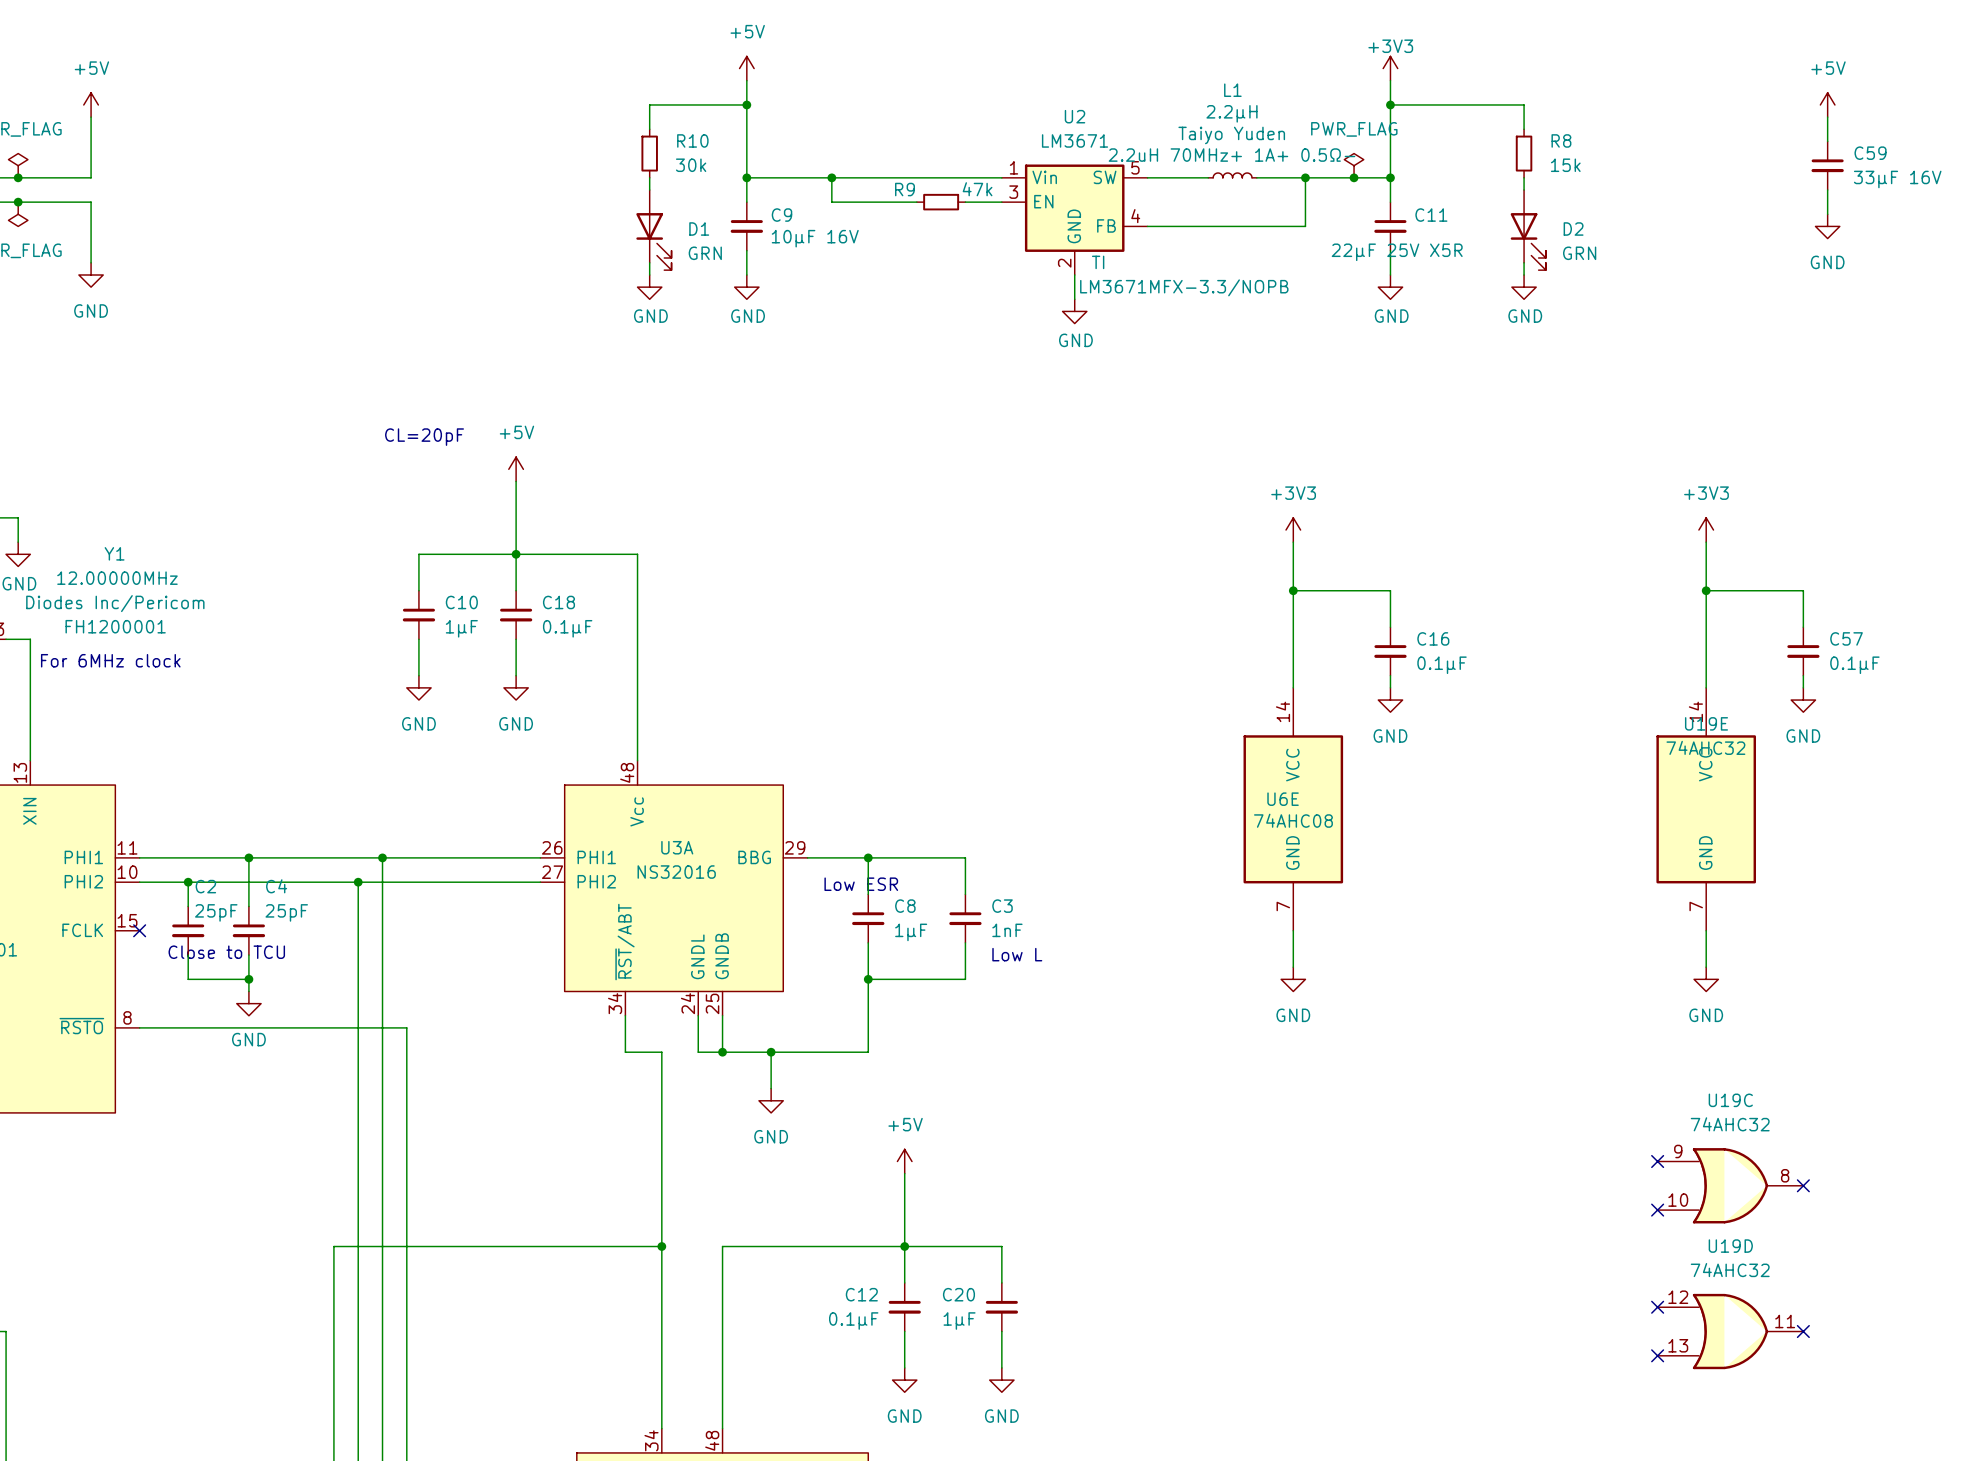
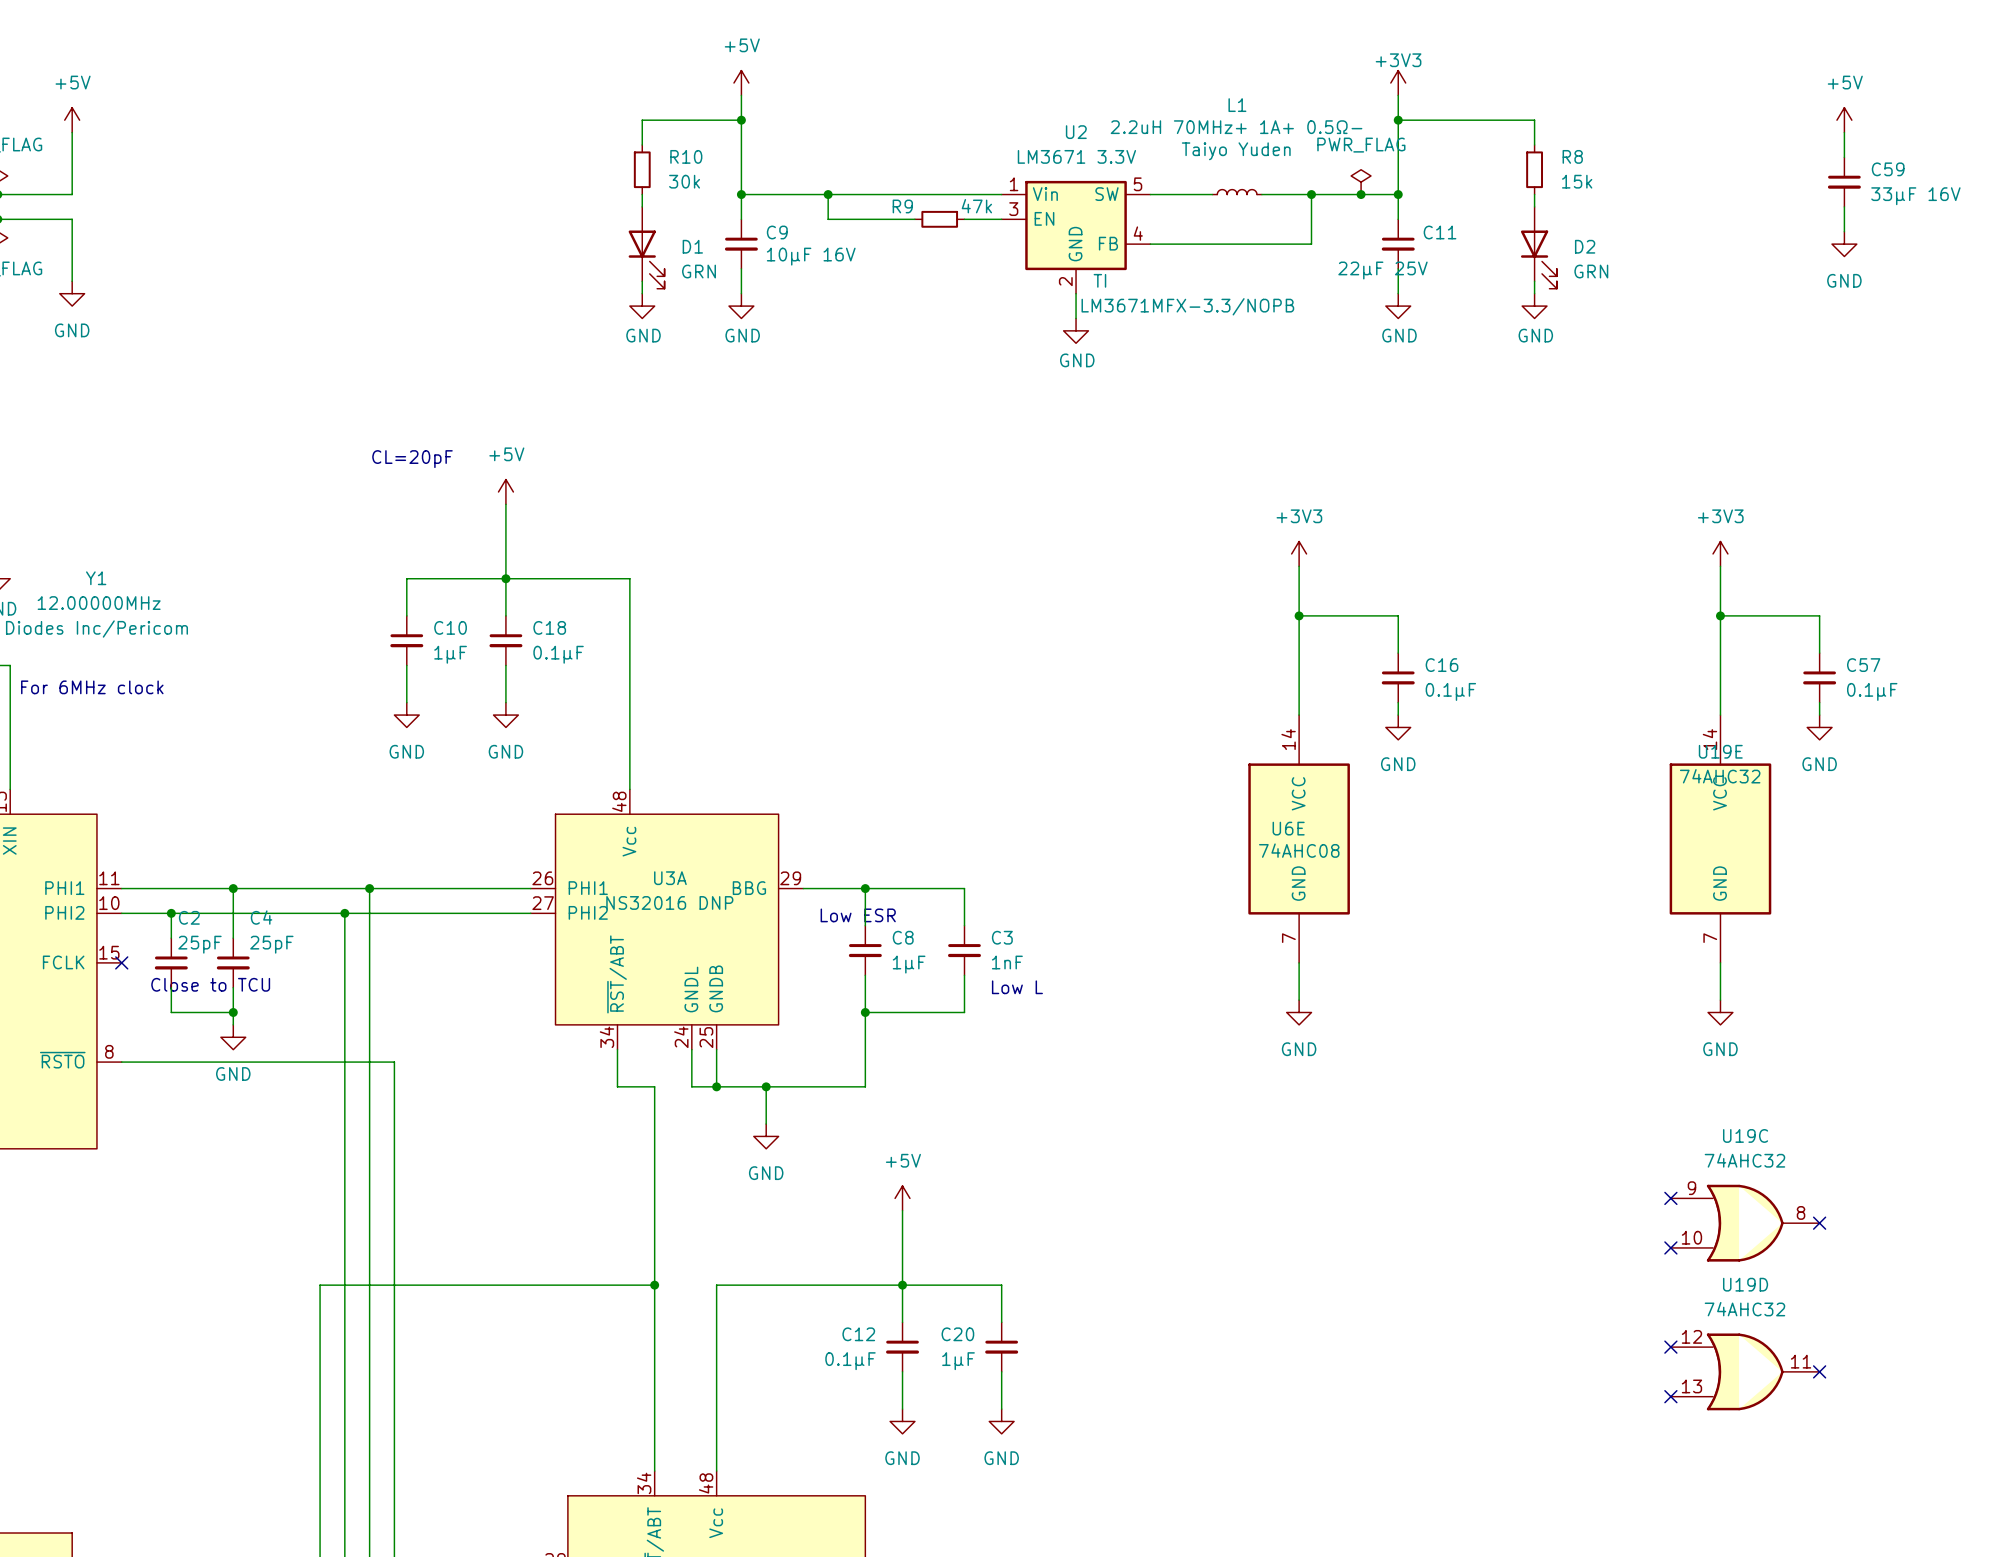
L1 value: 2.2µH (1232, 113) -> 2.2uH 70MHz+ 1A+ 0.5Ω- (1236, 127)
U2 value: LM3671 (1075, 140) -> LM3671 3.3V (1076, 156)
L1 text: 2.2uH 70MHz+ 1A+ 0.5Ω- (1232, 155) -> none
C11 value: 22µF 25V X5R (1397, 252) -> 22µF 25V (1383, 270)
Y1 text: FH1200001 (115, 626) -> none
U3A value: NS32016 (676, 872) -> NS32016 DNP (669, 902)

